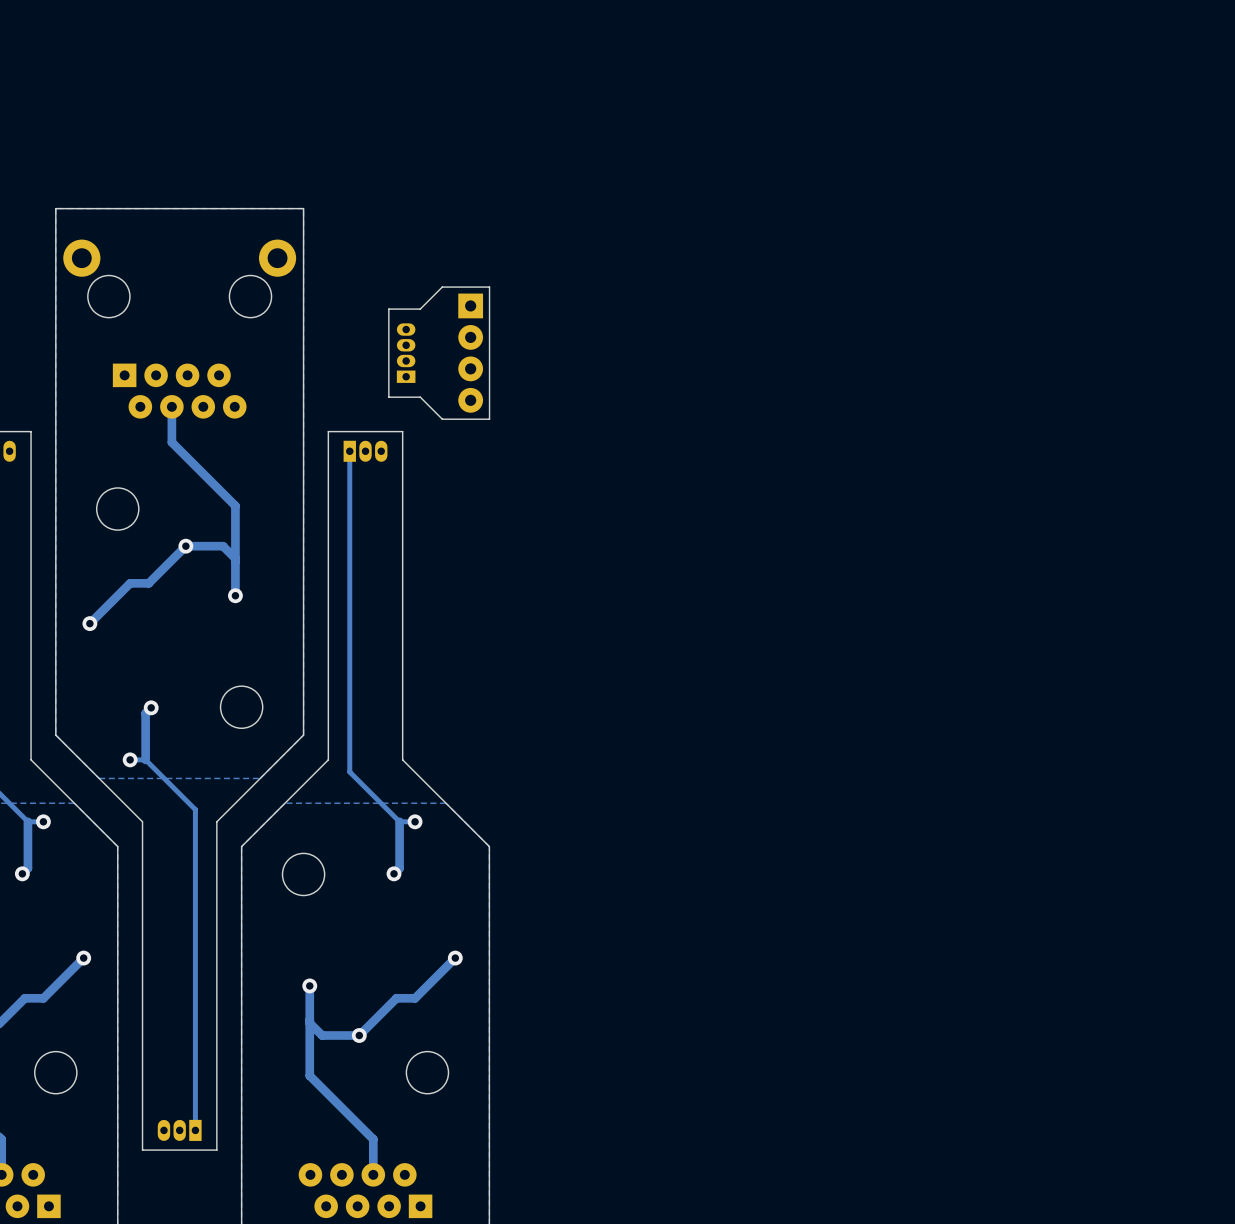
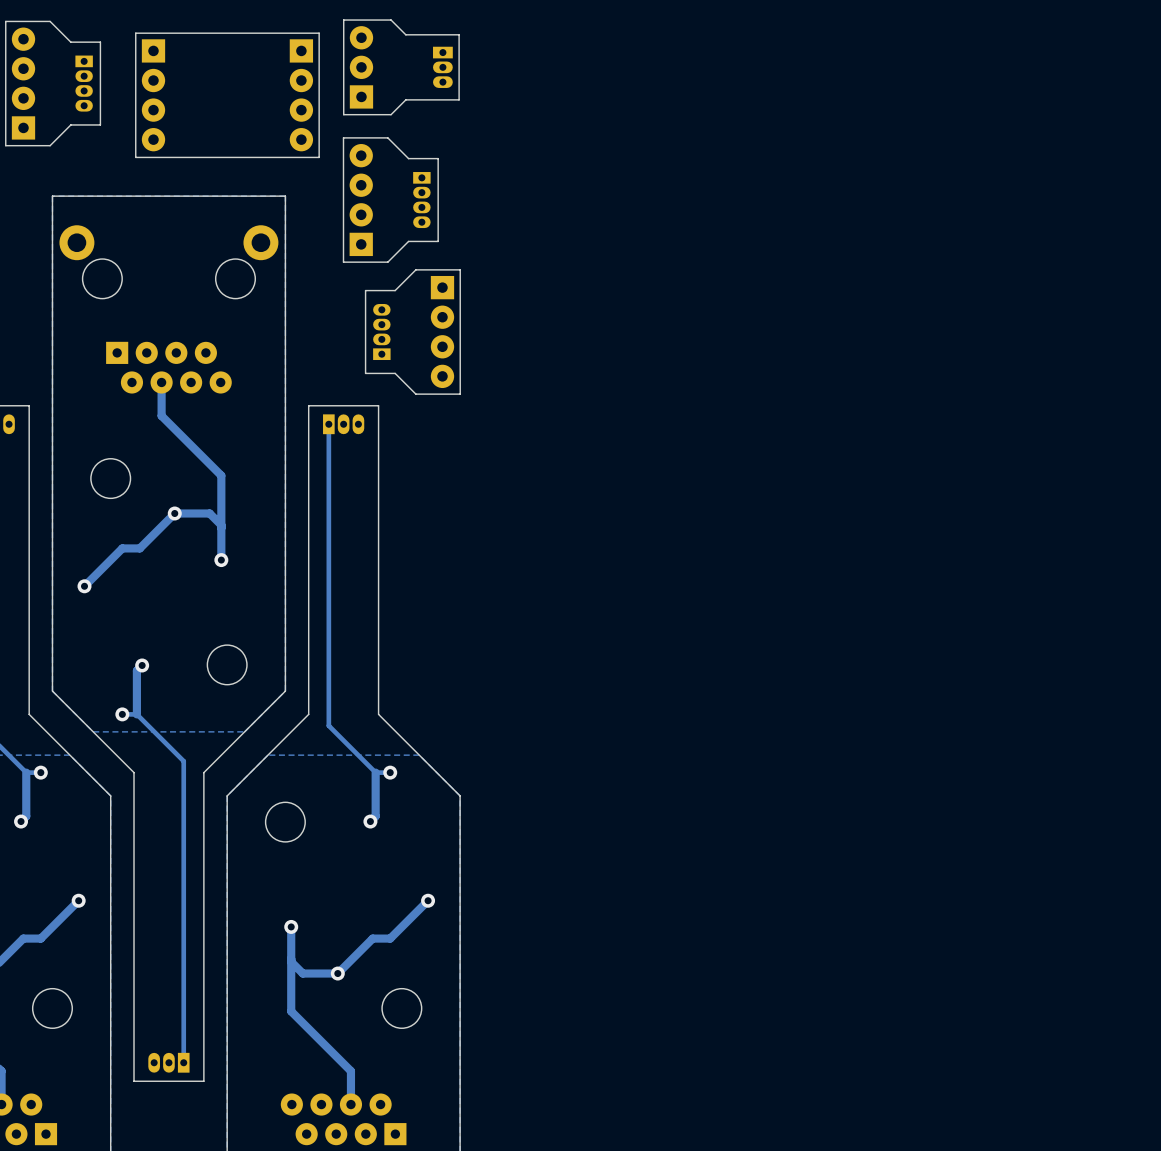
board edge: none -> (391, 20) (343, 20) (343, 114) (391, 114) (405, 99) (459, 99) (459, 34) (405, 34) (391, 20)
board edge: none -> (50, 21) (5, 21) (5, 145) (50, 145) (70, 124) (100, 124) (100, 42) (70, 42) (50, 21)
board edge: none -> (319, 33) (135, 33) (135, 157) (319, 157) (319, 33)
part: none -> (361, 67)
part: none -> (442, 67)
part: none -> (23, 83)
part: none -> (84, 83)
part: none -> (153, 95)
part: none -> (301, 95)
board edge: none -> (387, 137) (408, 158) (438, 158) (438, 241) (408, 241) (387, 262) (343, 262) (343, 137) (387, 137)
part: none -> (361, 200)
part: none -> (421, 200)

